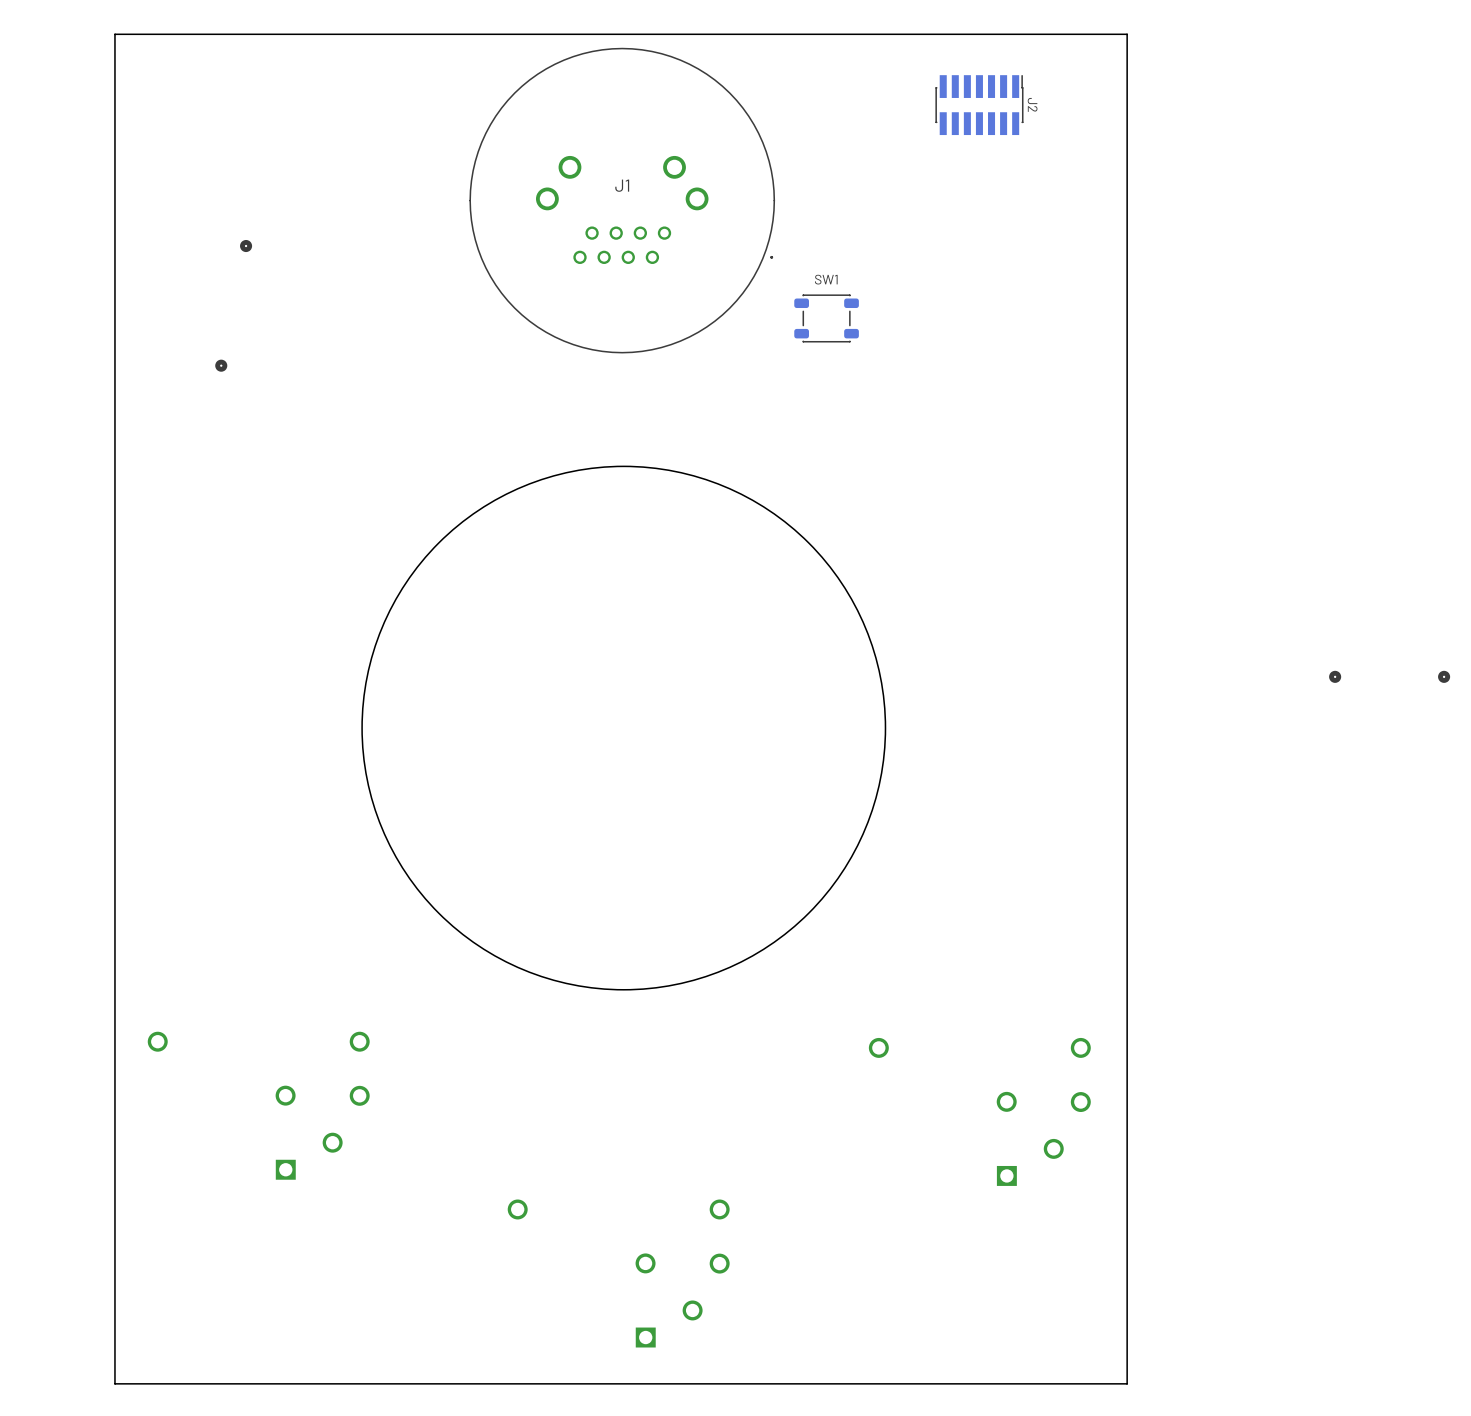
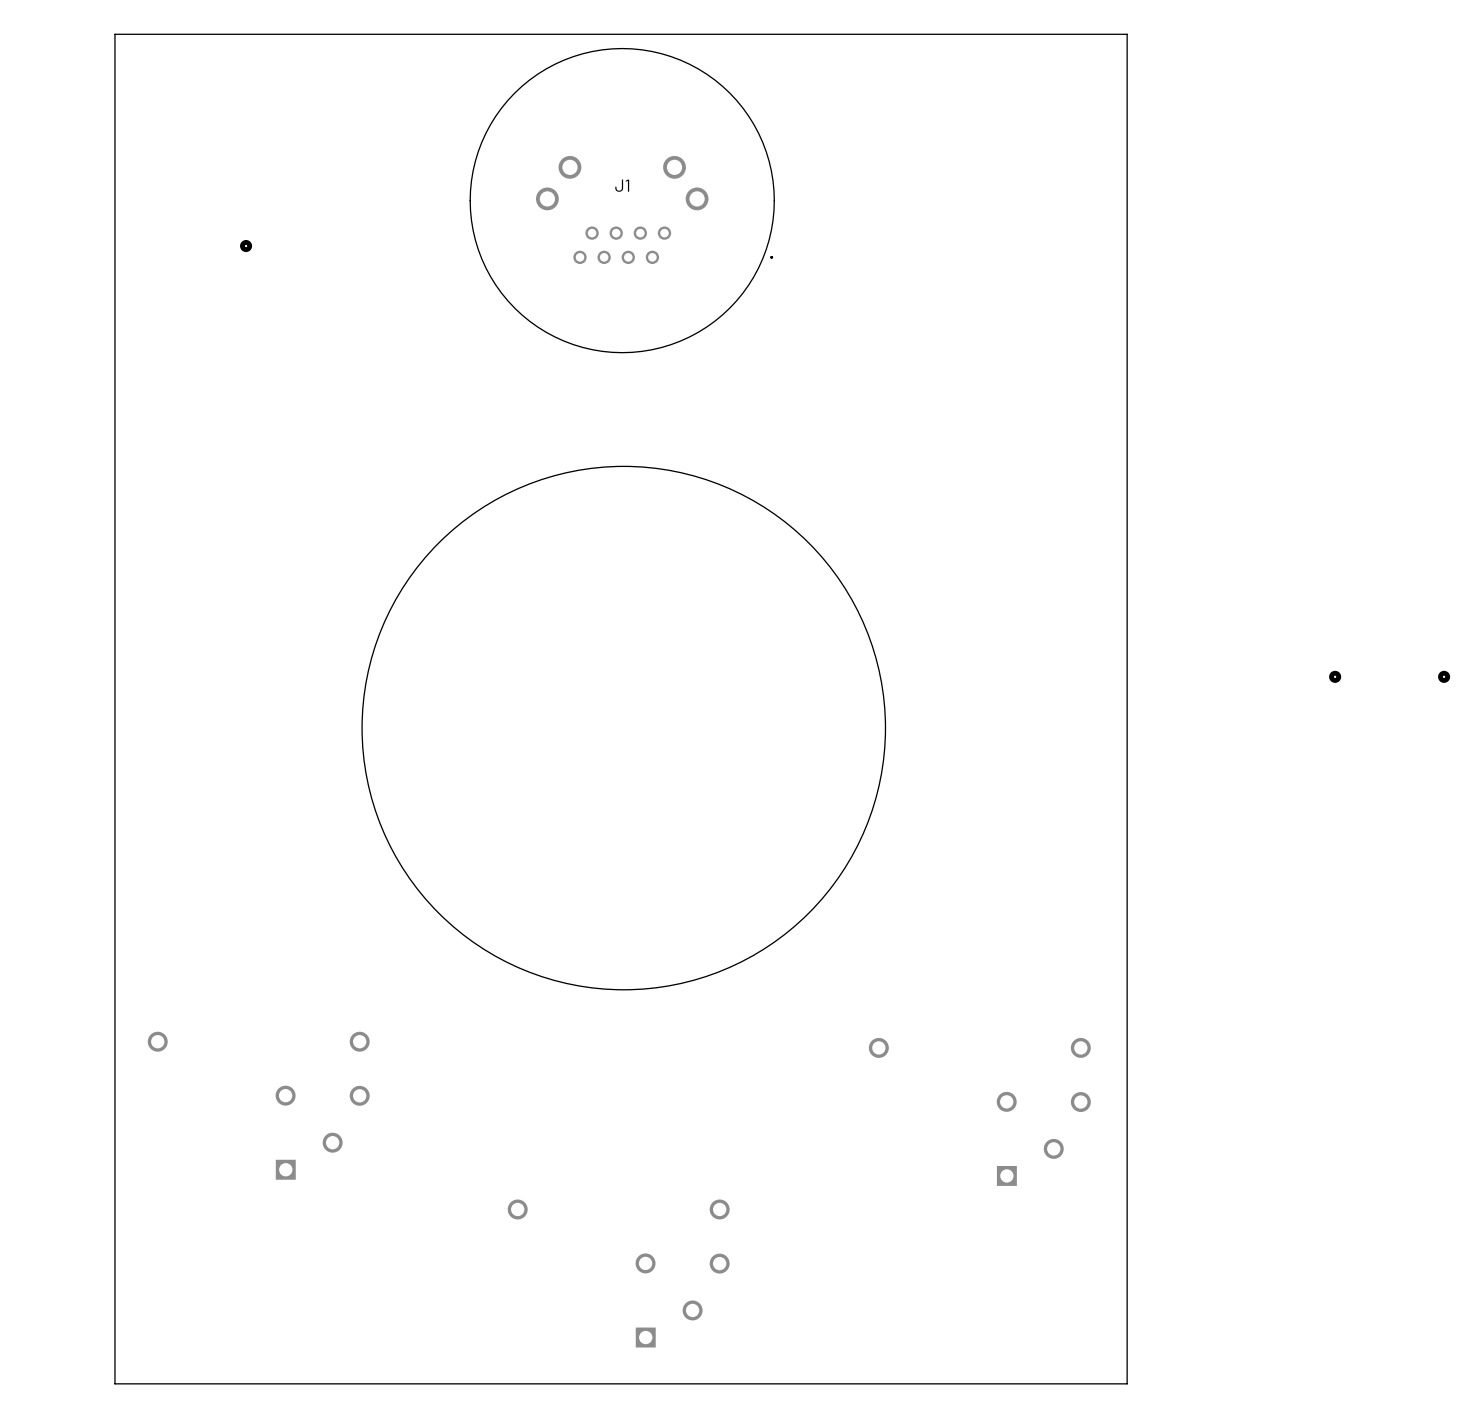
J2: (979, 105) -> none
SW1: (826, 318) -> none
part: (221, 365) -> none

